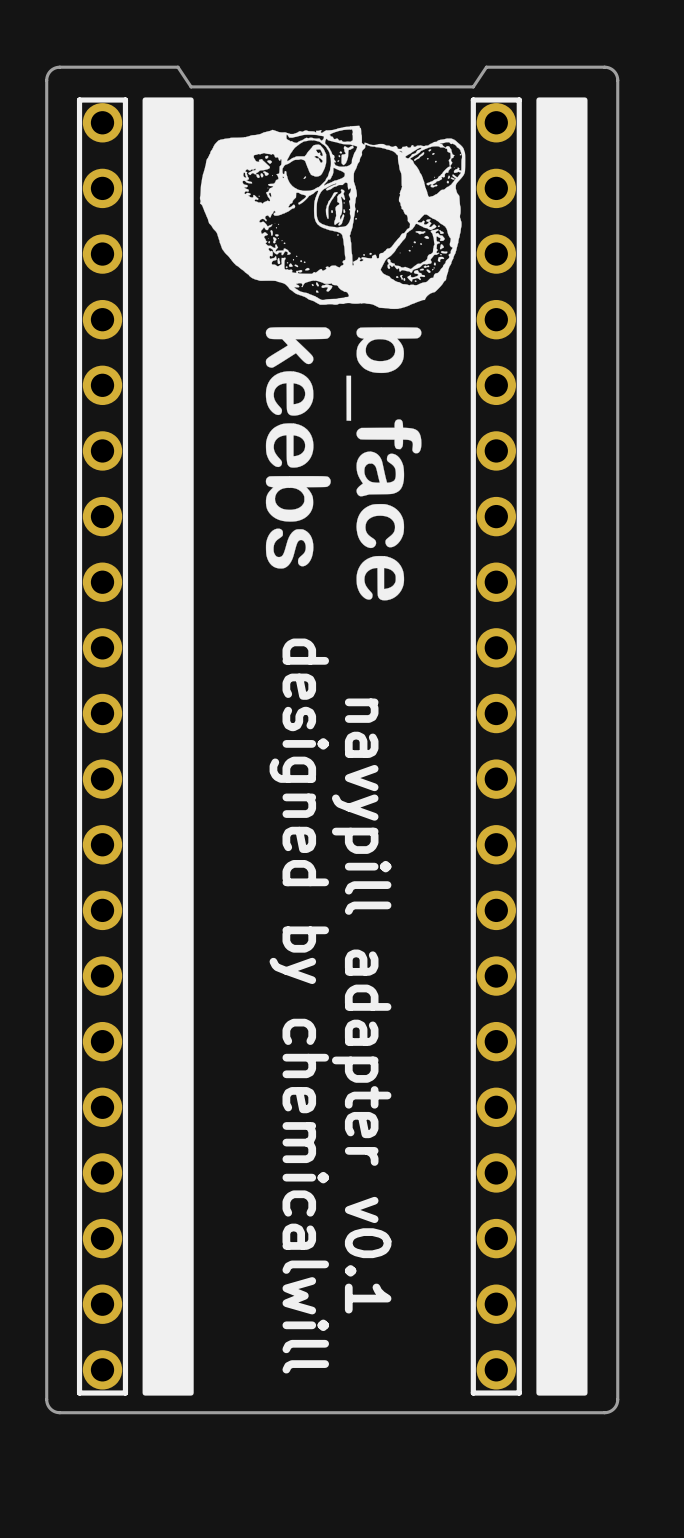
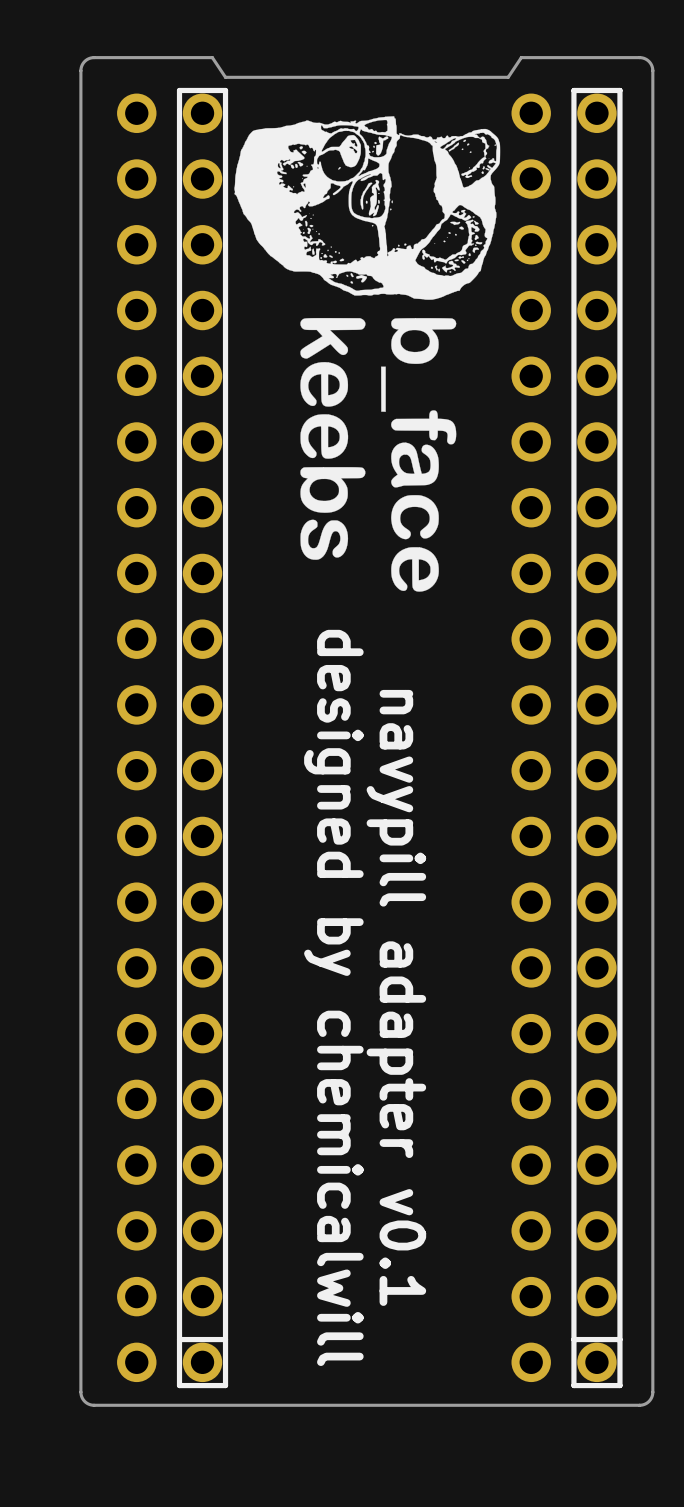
drawing: [142, 97, 194, 1396] -> none
drawing: [536, 97, 588, 1396] -> none
line: (125, 100) (79, 100) (79, 1393) (125, 1393) (125, 100) -> (225, 90) (179, 90) (179, 1385) (225, 1385) (225, 90)
line: (519, 100) (473, 100) (473, 1393) (519, 1393) (519, 100) -> (619, 90) (573, 90) (573, 1385) (619, 1385) (619, 90)
line: none -> (225, 1339) (179, 1339)
line: none -> (619, 1339) (573, 1339)

